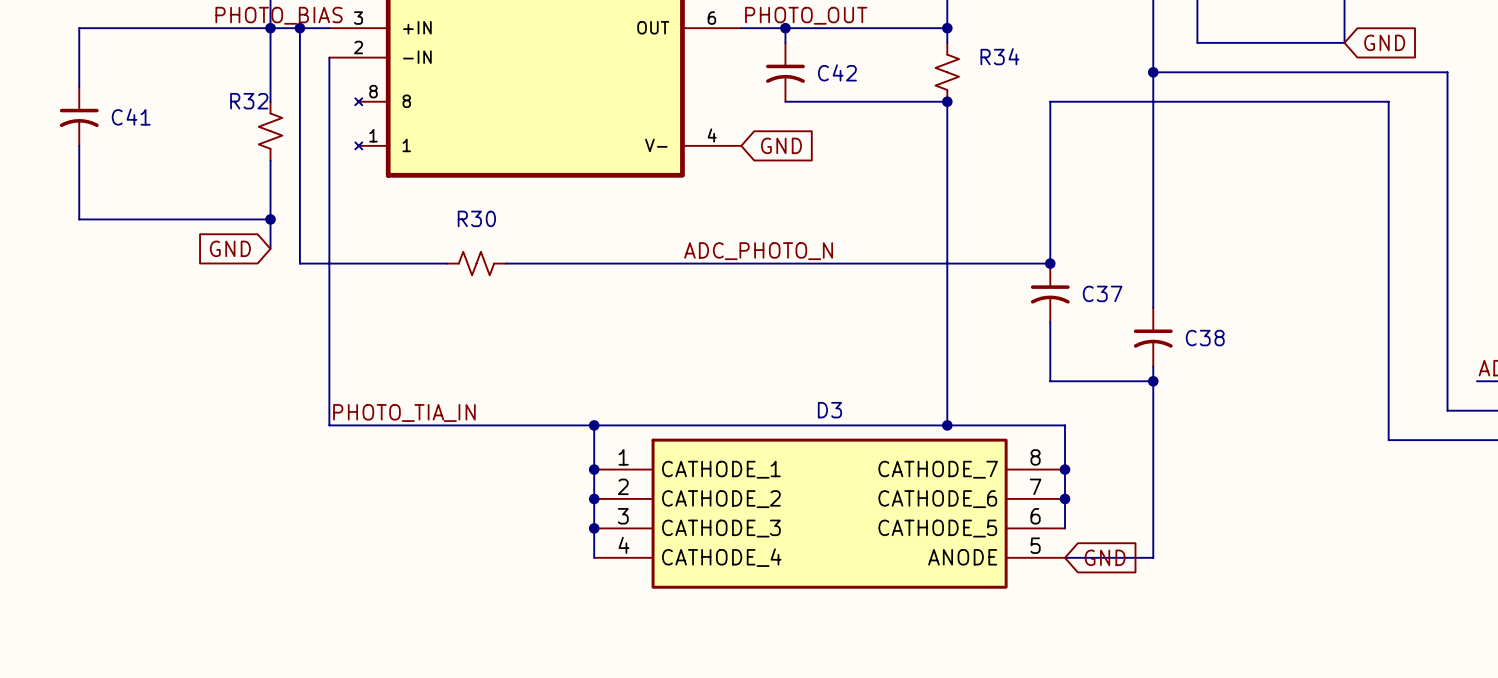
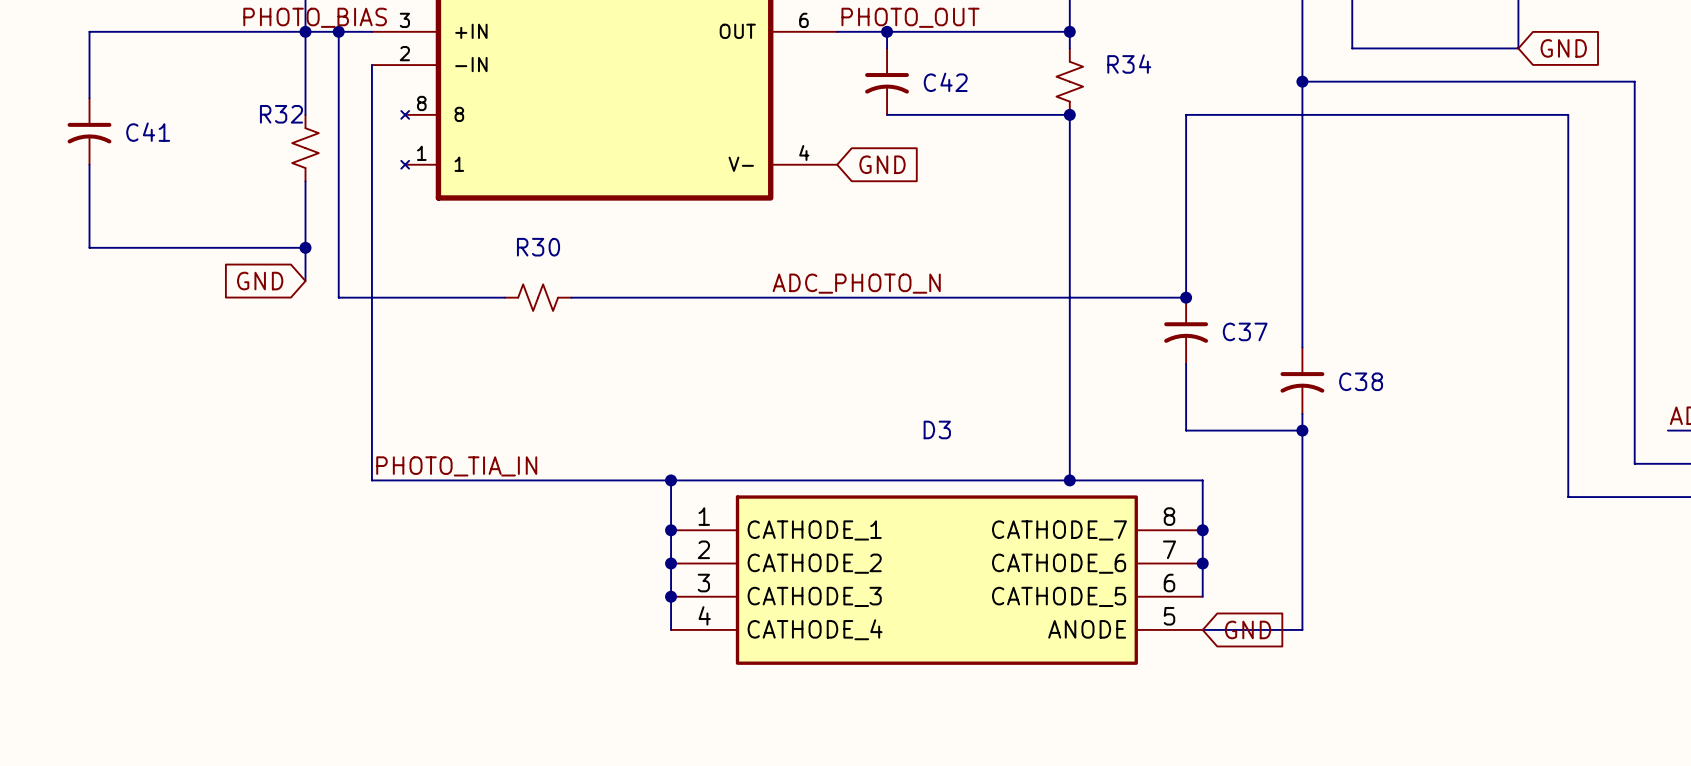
D3 name position: D3 (829, 410) -> D3 (937, 429)

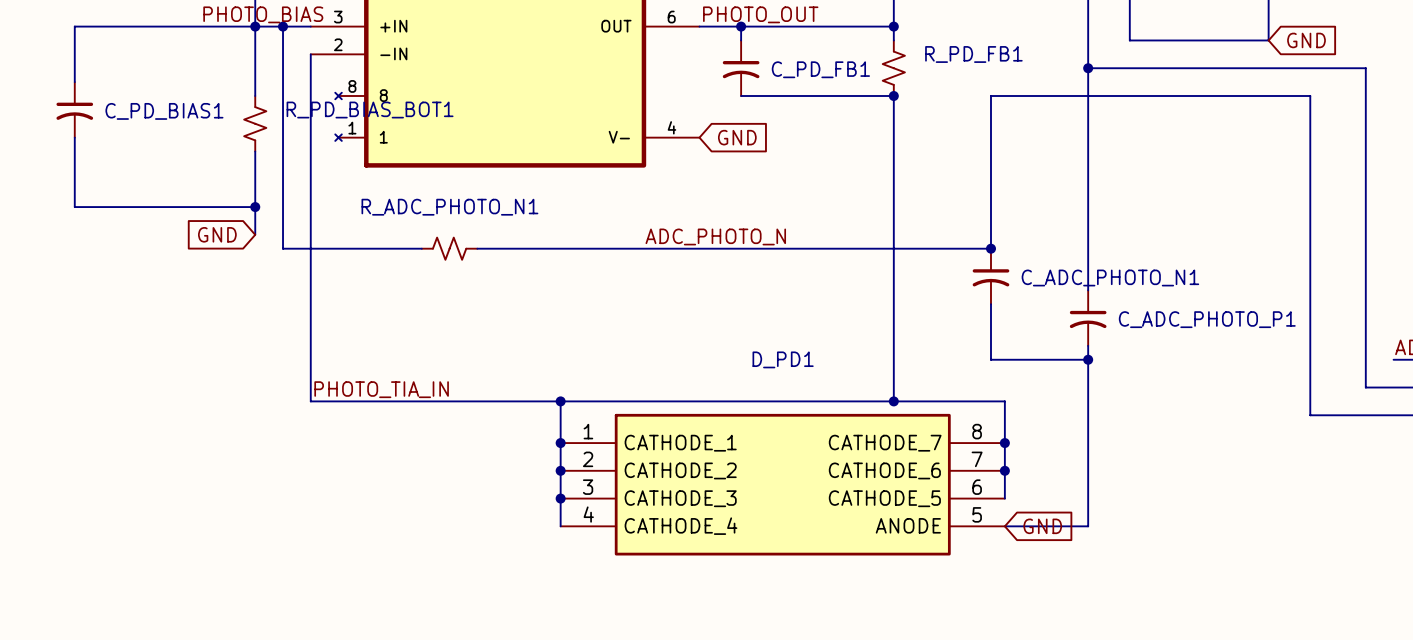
R34 name: R34 (1129, 64) -> R_PD_FB1 (973, 54)
C42 name: C42 (945, 82) -> C_PD_FB1 (820, 69)
R32 name: R32 (281, 114) -> R_PD_BIAS_BOT1 (370, 110)
C41 name: C41 (148, 132) -> C_PD_BIAS1 (164, 111)
R30 name: R30 (538, 247) -> R_ADC_PHOTO_N1 (449, 207)
C37 name: C37 (1245, 331) -> C_ADC_PHOTO_N1 (1110, 277)
C38 name: C38 (1361, 381) -> C_ADC_PHOTO_P1 (1207, 319)
D3 name: D3 (937, 429) -> D_PD1 (783, 359)

